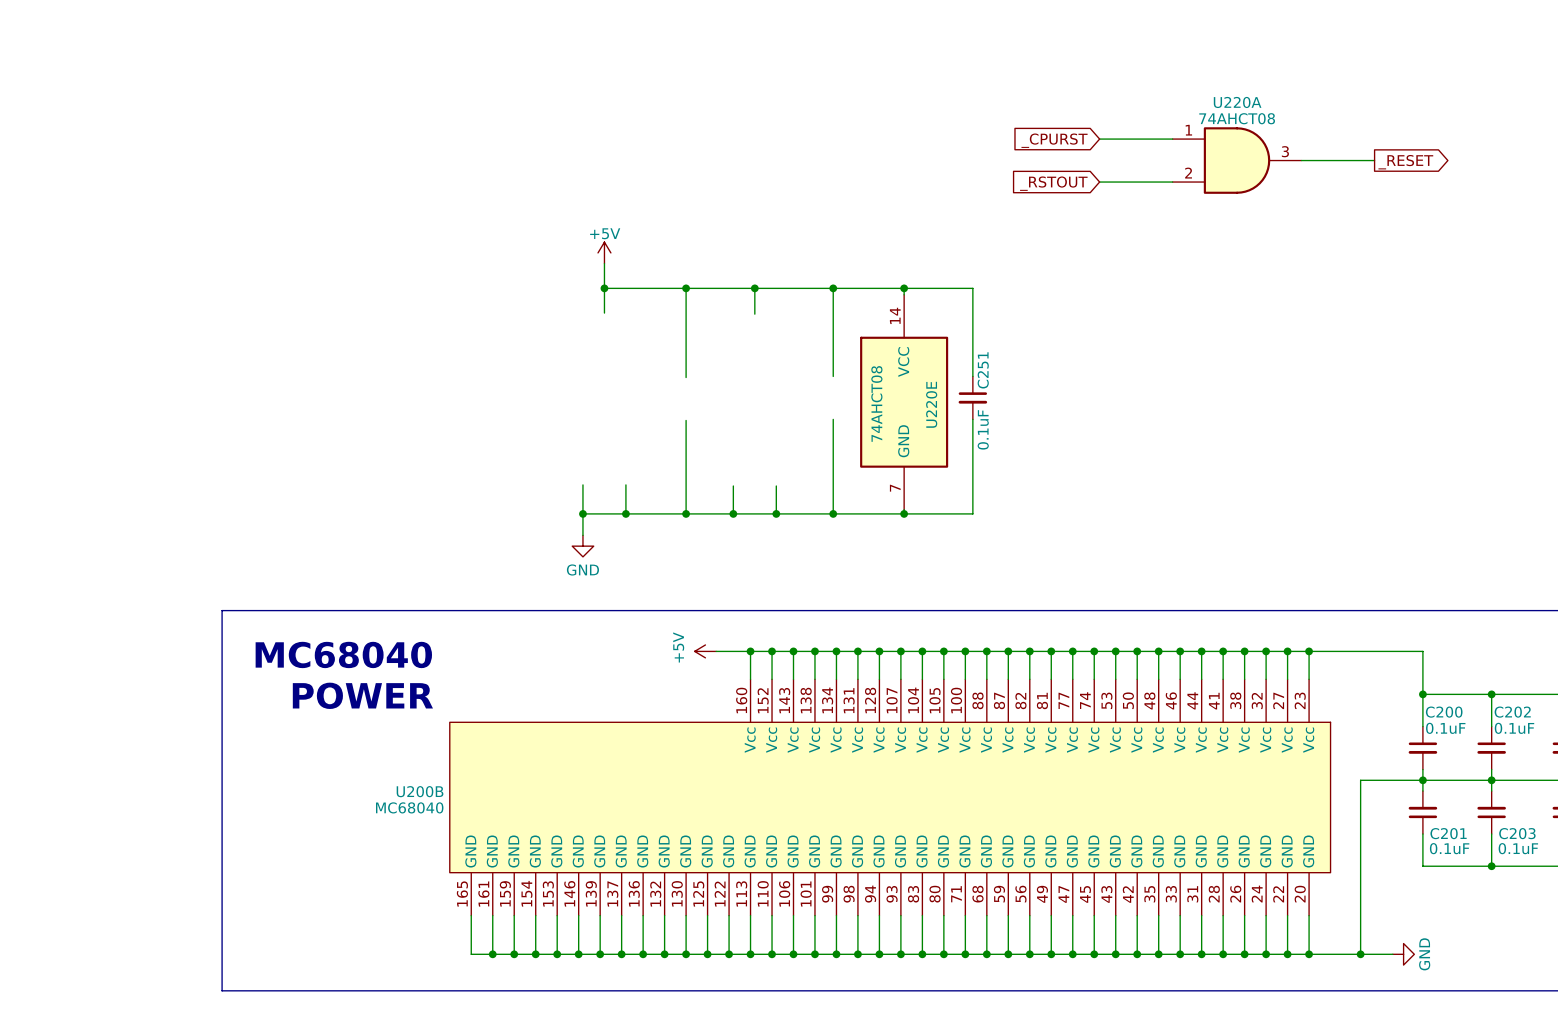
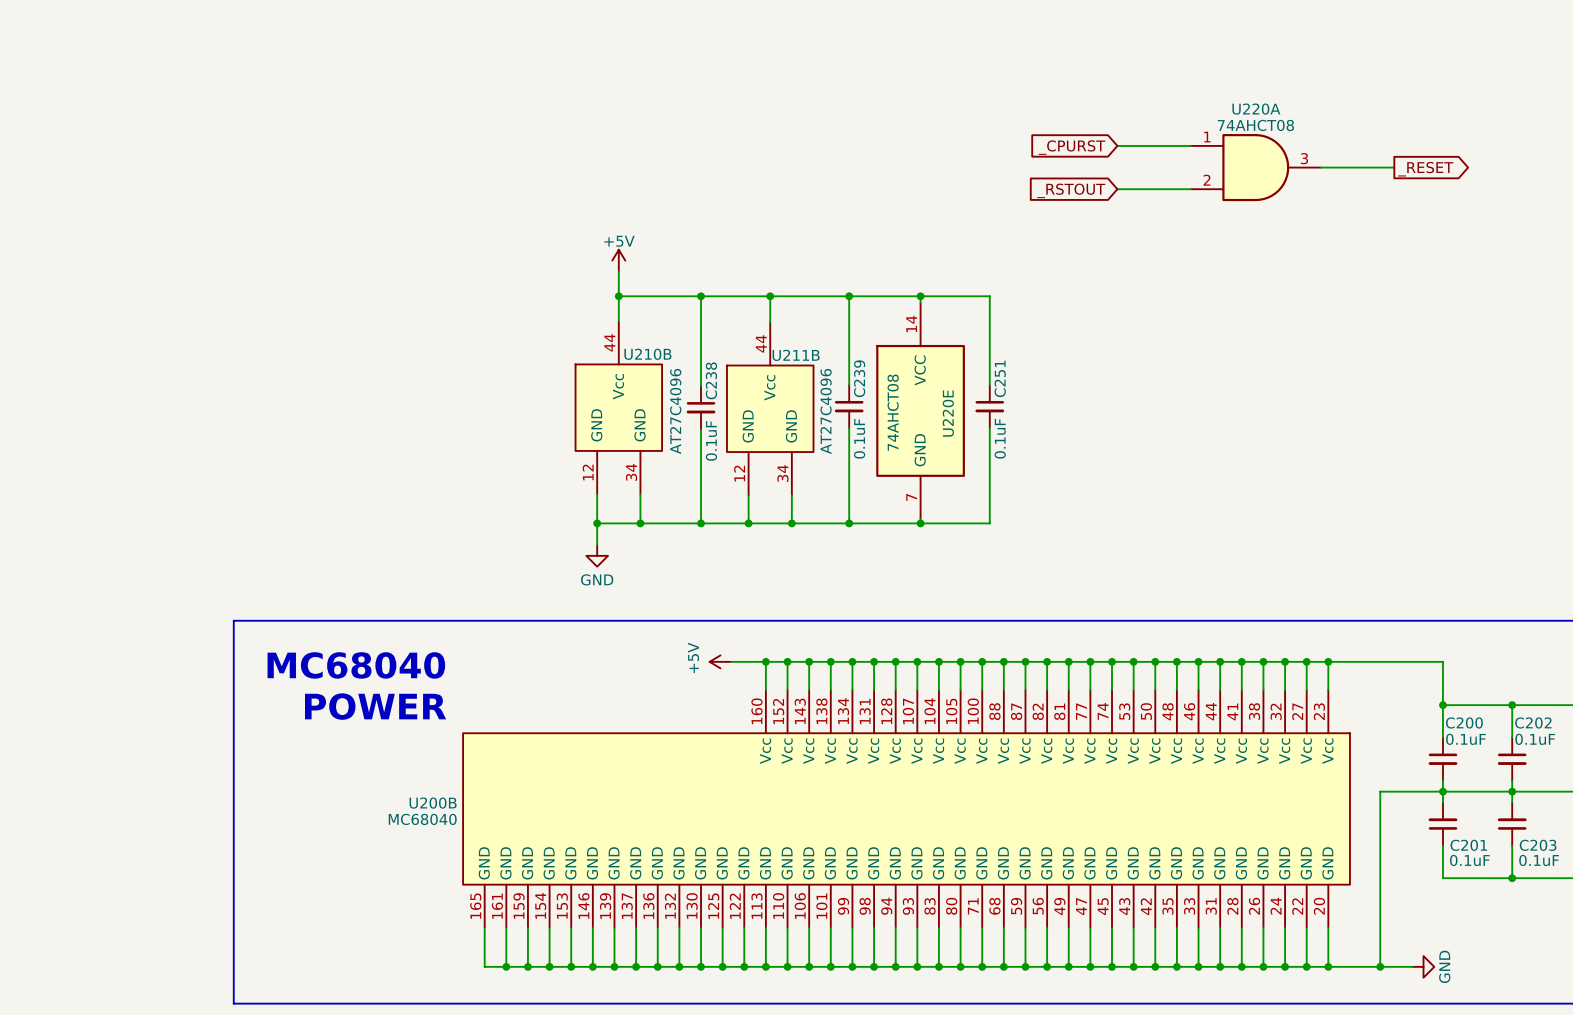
C239: none -> 0.1uF (849, 406)
U210B: none -> AT27C4096 (618, 407)
C238: none -> 0.1uF (701, 407)
U211B: none -> AT27C4096 (770, 408)

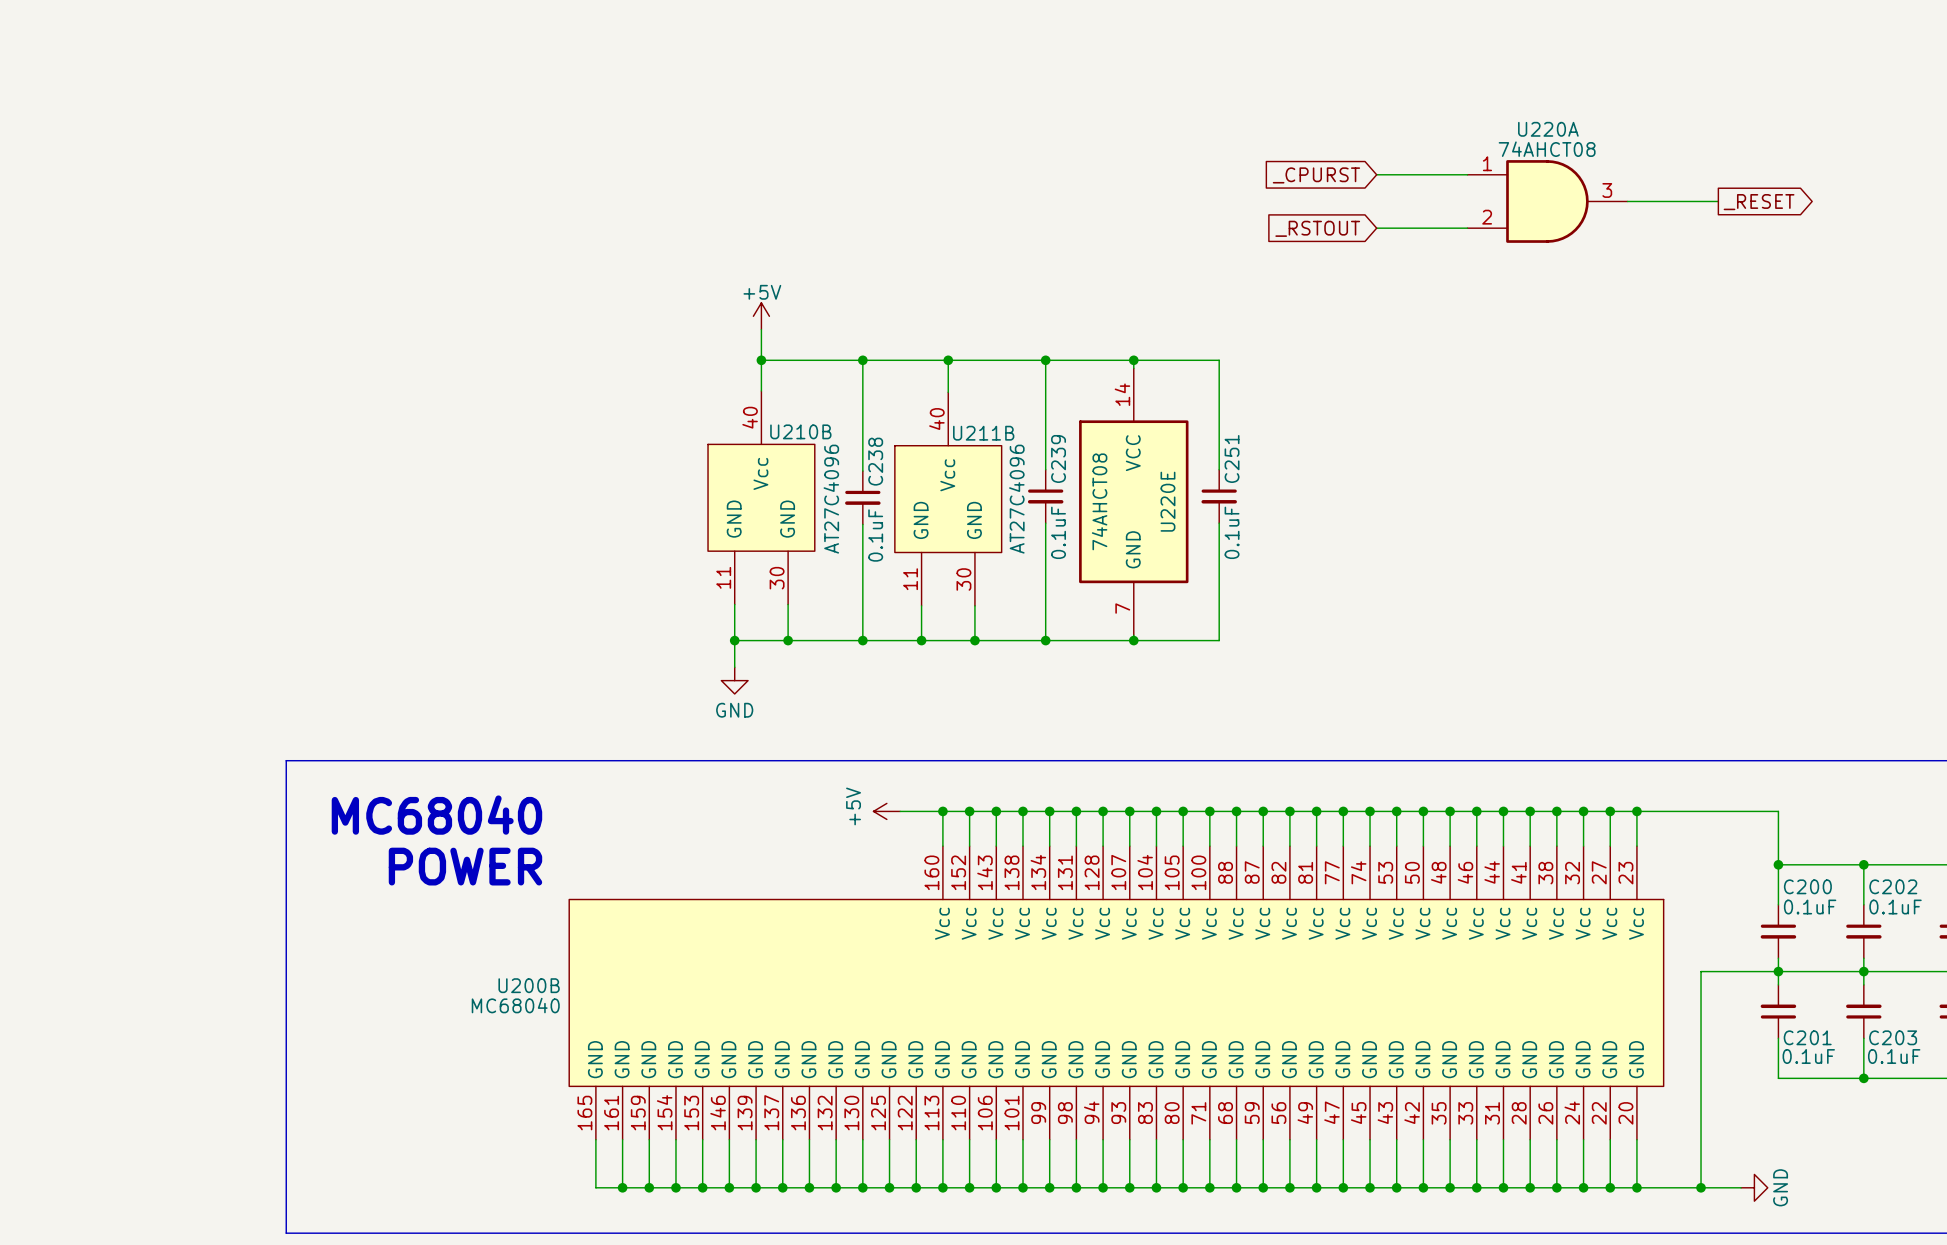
U210B pin number: 44 (609, 342) -> 40 (750, 417)
U211B pin number: 44 (761, 343) -> 40 (936, 419)
U210B pin number: 12 (588, 472) -> 11 (723, 577)
U210B pin number: 34 (631, 472) -> 30 (777, 578)
U211B pin number: 12 (739, 473) -> 11 (910, 579)
U211B pin number: 34 (782, 473) -> 30 (963, 579)

